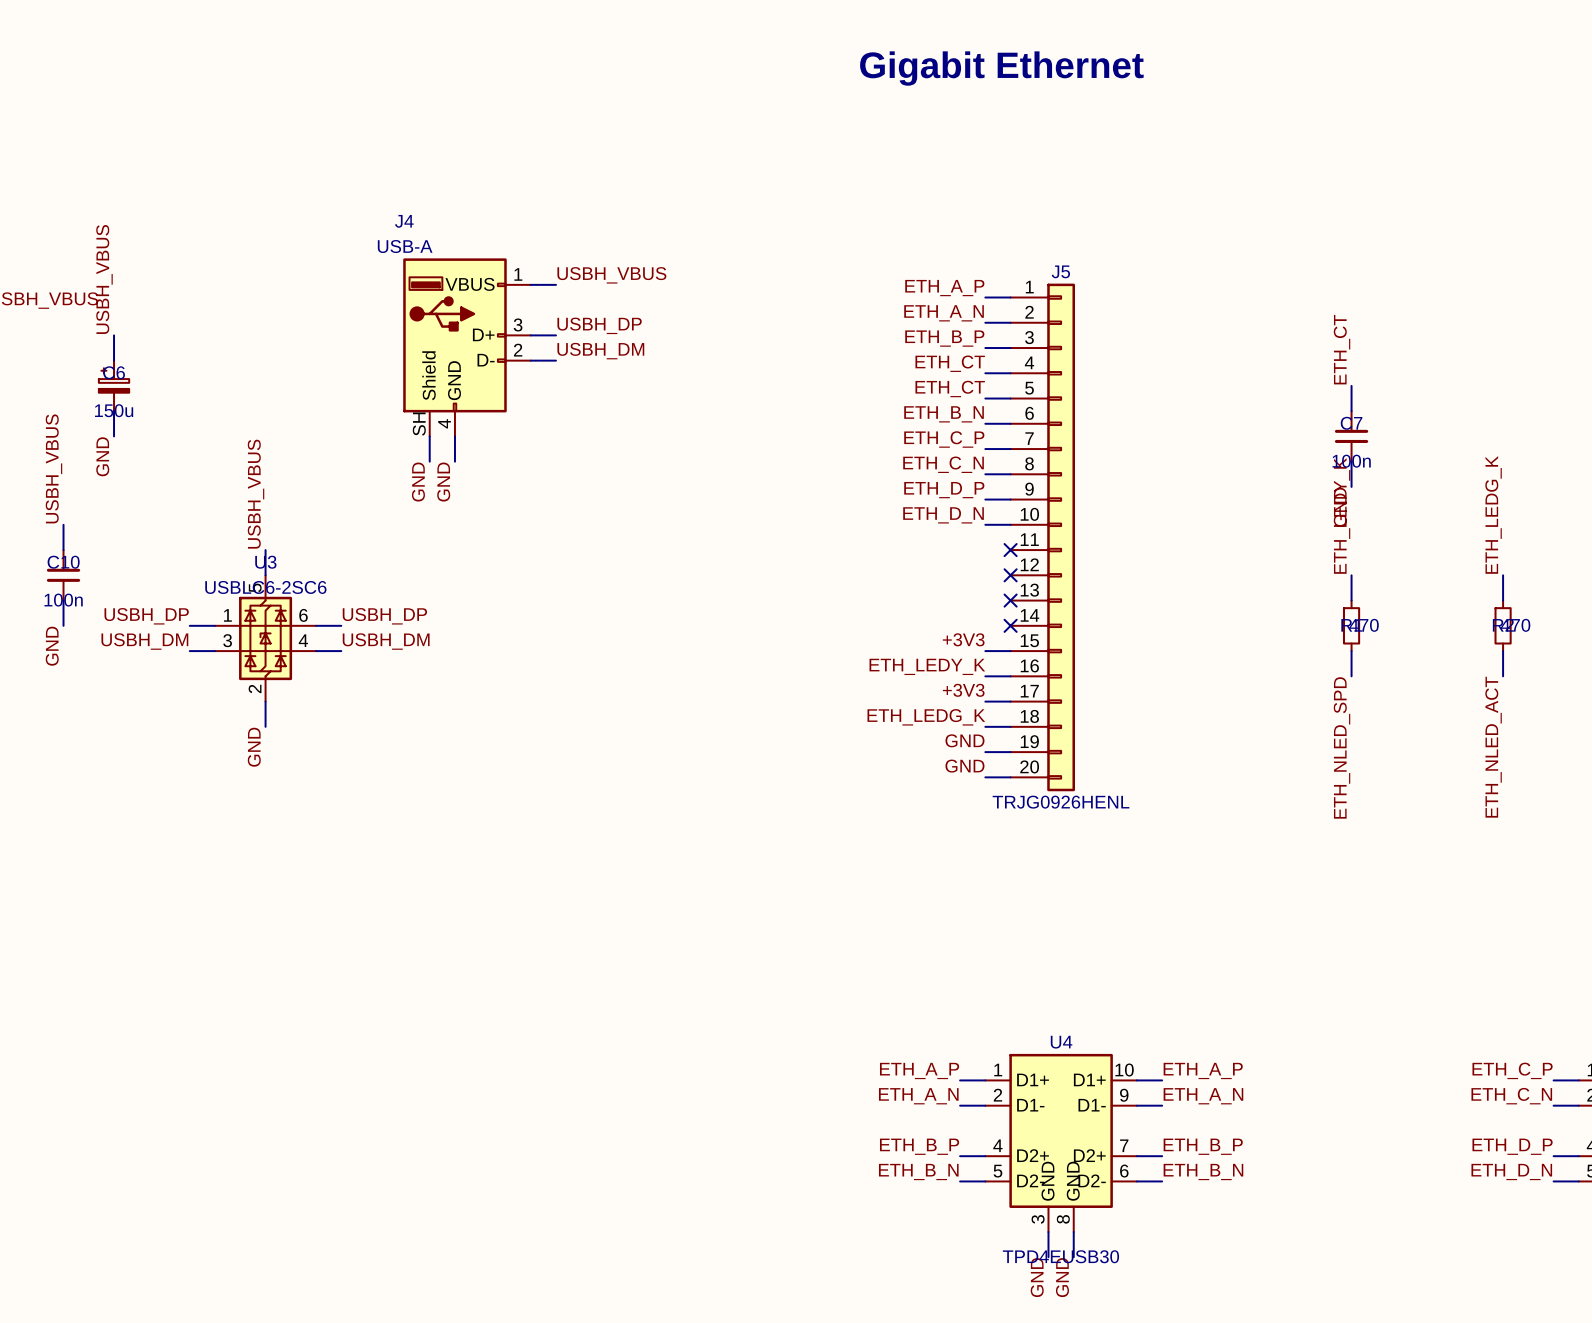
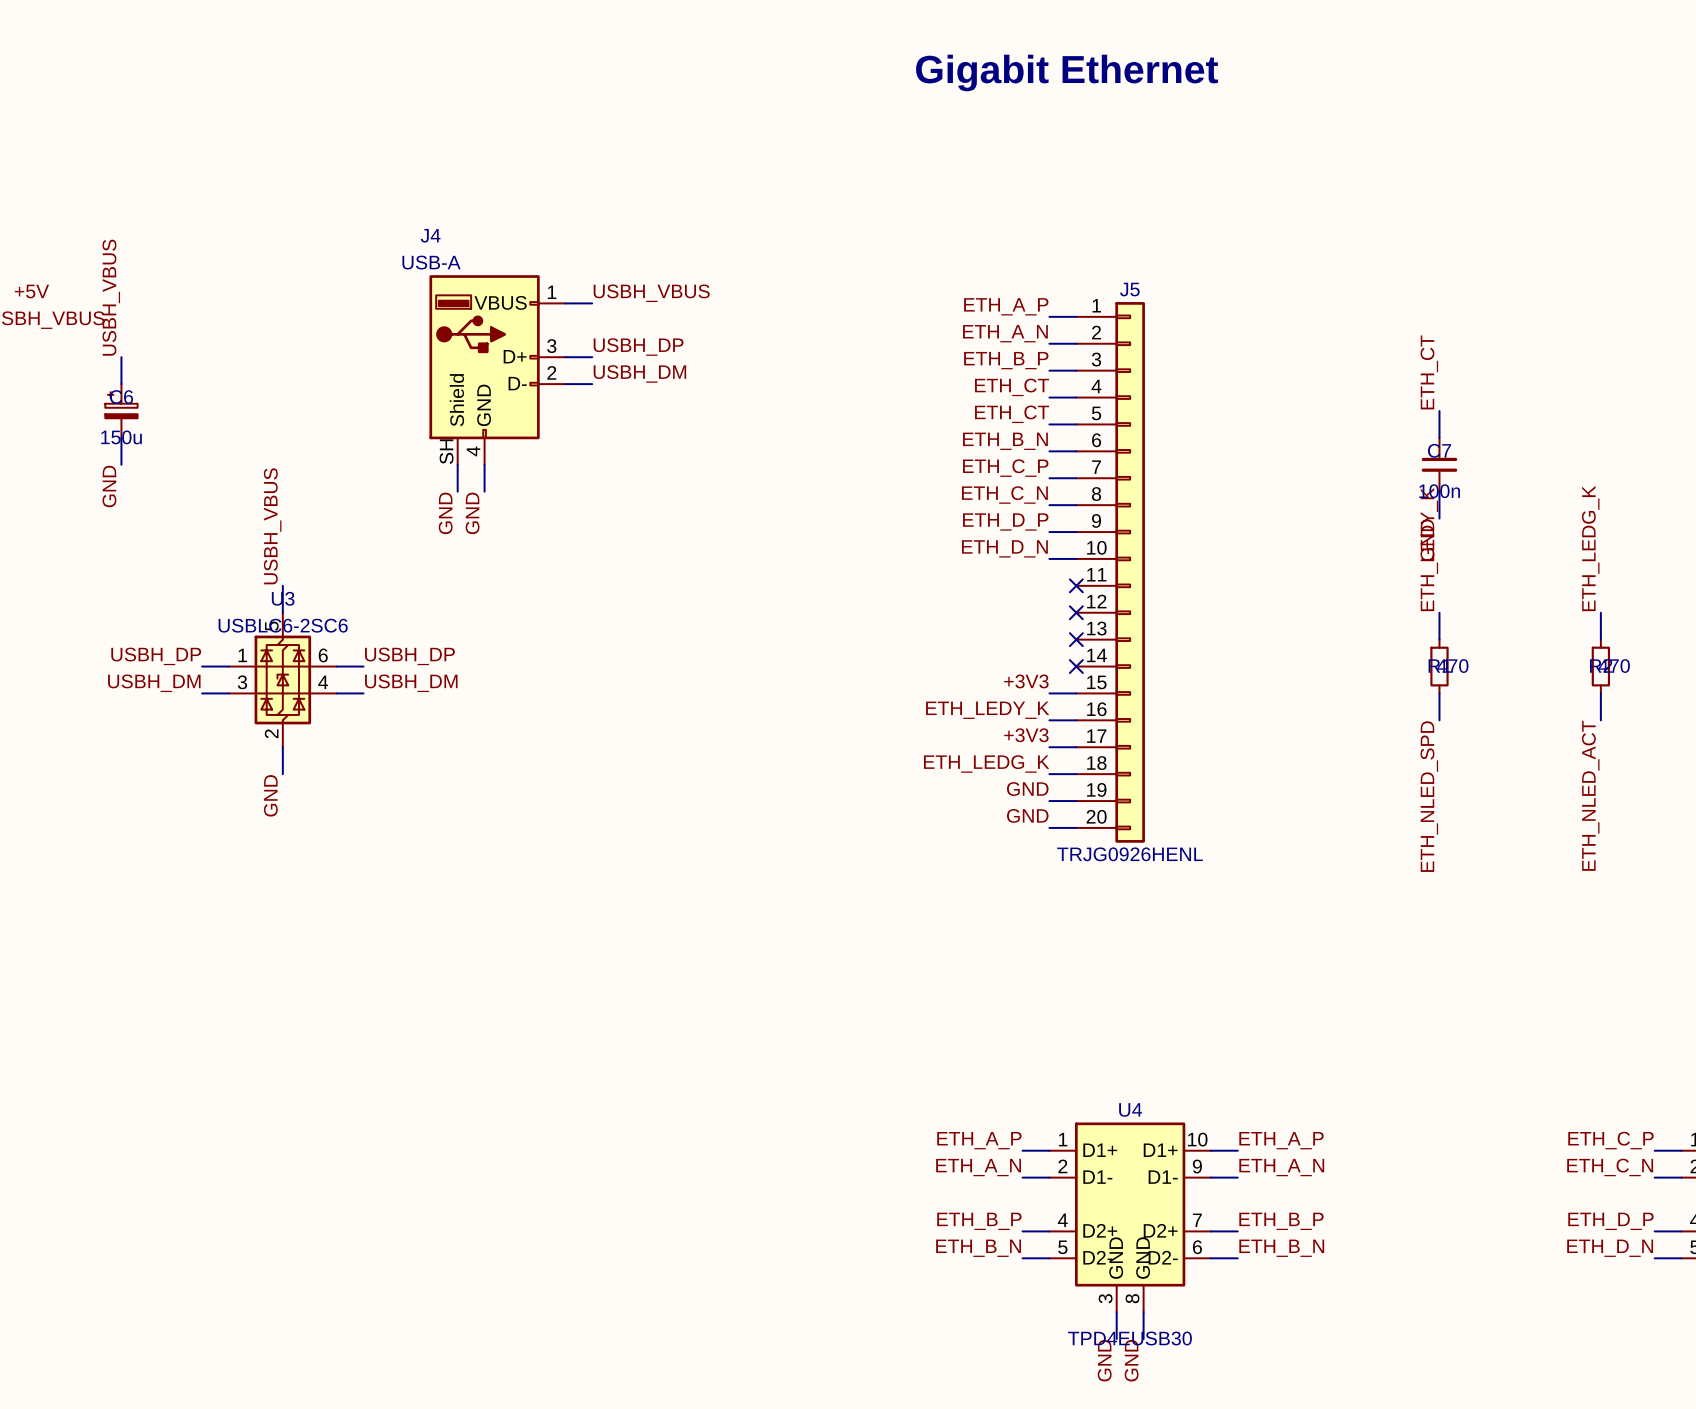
label: none -> +5V (31, 291)
label: USBH_VBUS (53, 468) -> none
wire: (63, 524) (63, 550) -> none
C10: 100n (63, 575) -> none
wire: (63, 600) (63, 625) -> none
label: GND (52, 646) -> none

